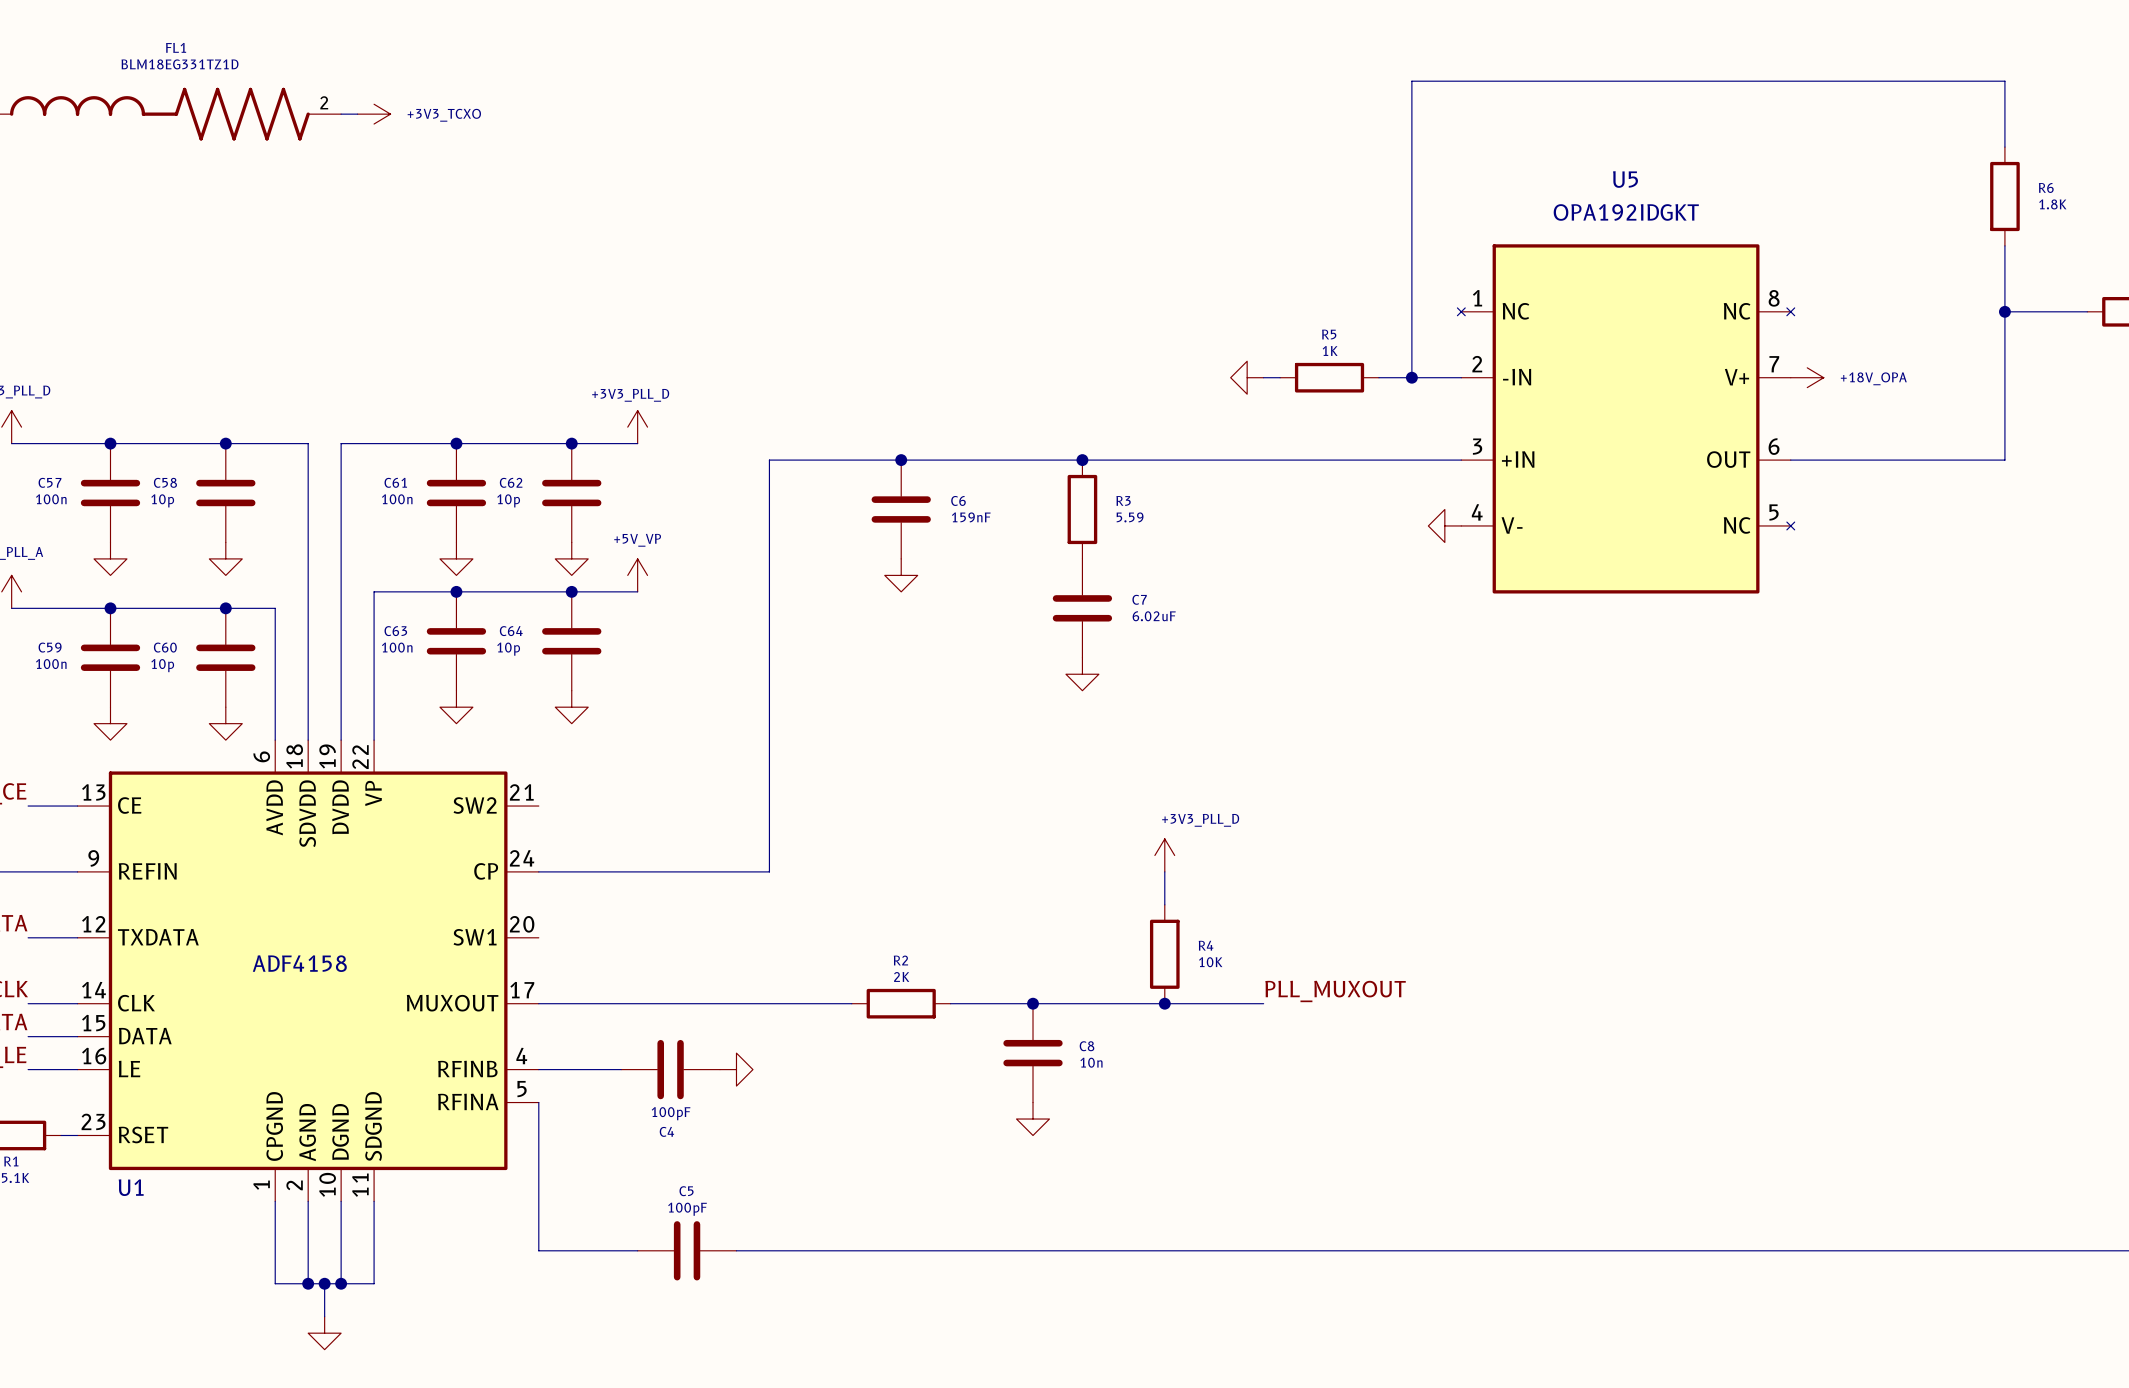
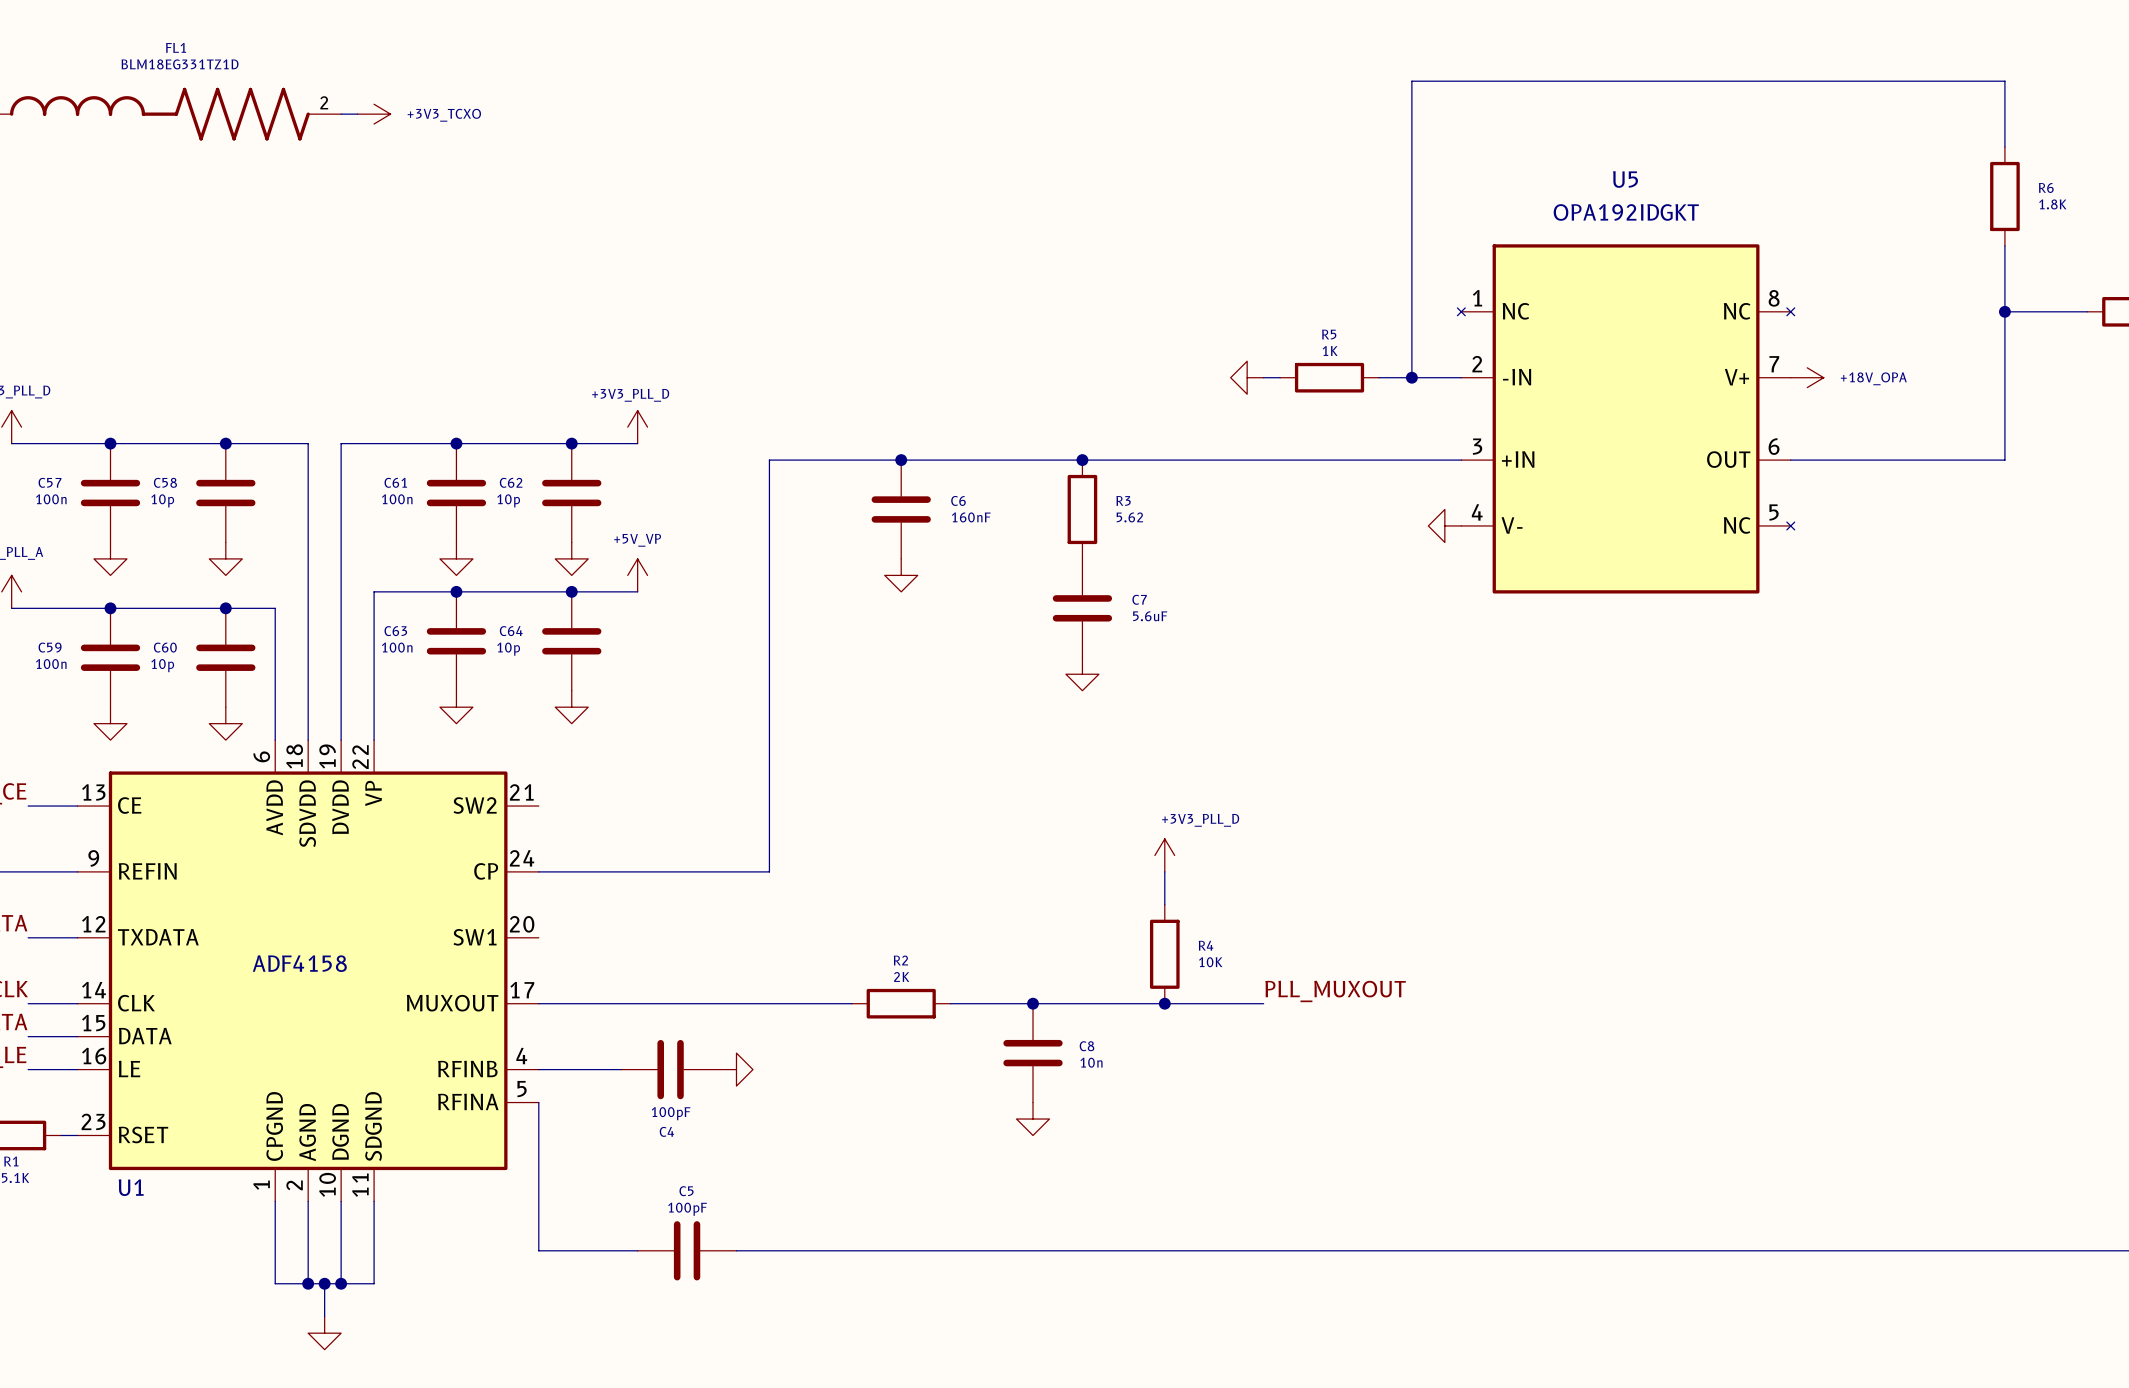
C6 value: 159nF (971, 517) -> 160nF (971, 517)
R3 value: 5.59 (1130, 517) -> 5.62 (1129, 517)
C7 value: 6.02uF (1154, 616) -> 5.6uF (1150, 616)

